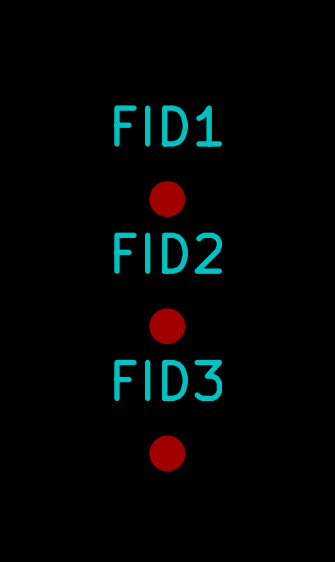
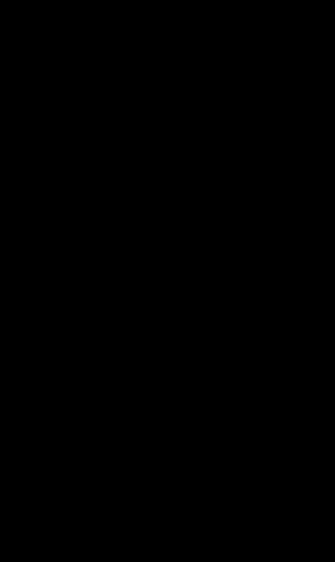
FID1: (167, 199) -> none
FID2: (167, 326) -> none
FID3: (167, 453) -> none

